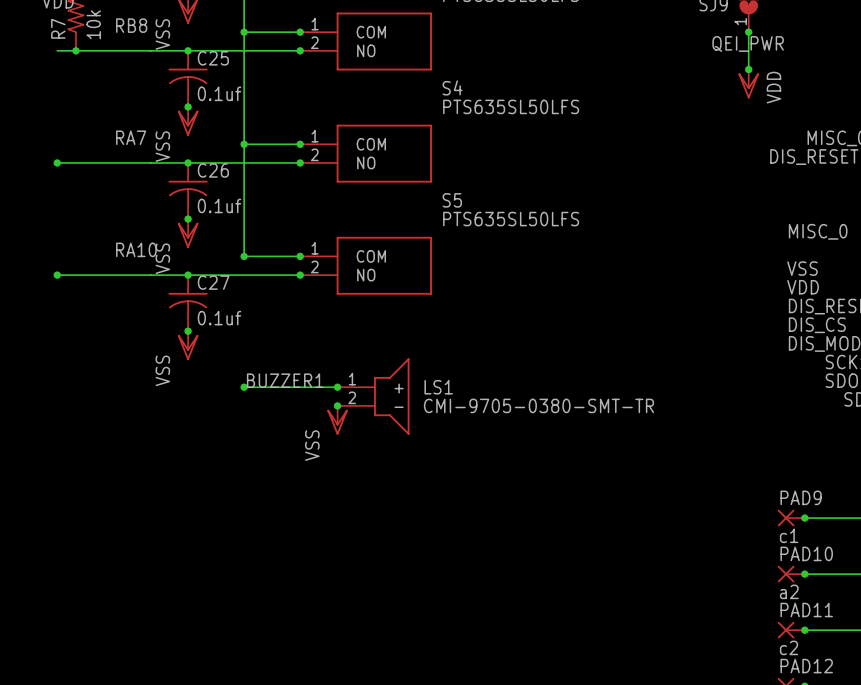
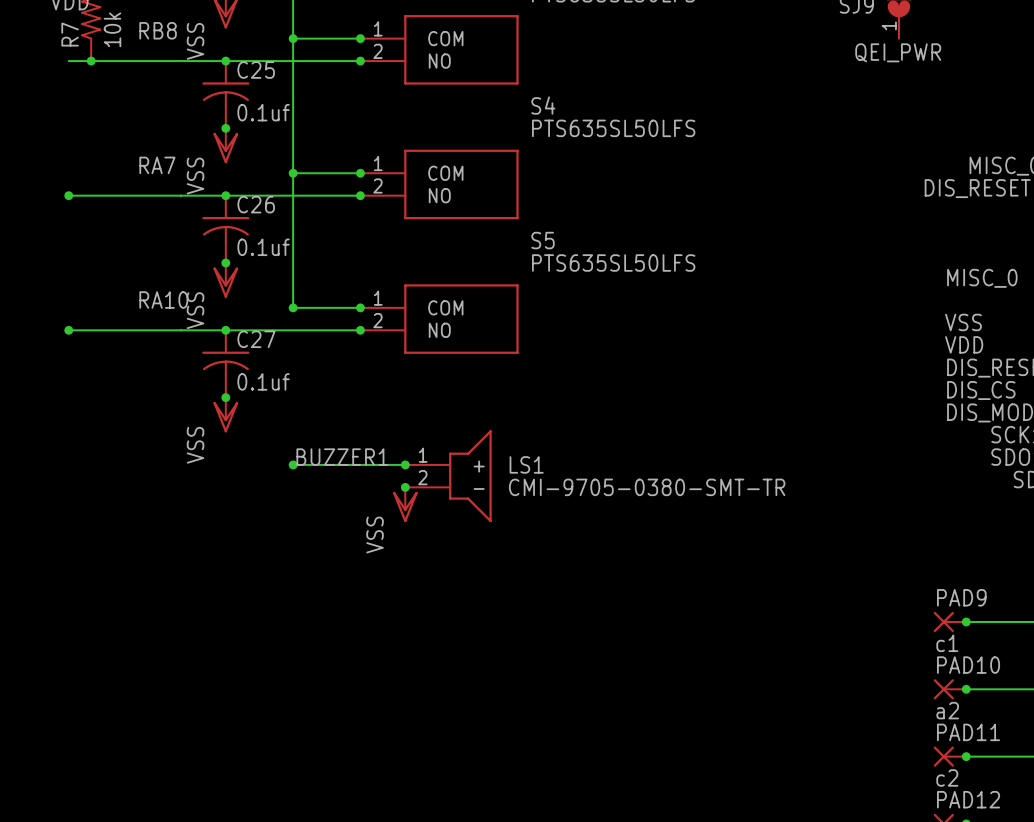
wire: (748, 32) (748, 69) -> none
junction: (748, 32) -> none
junction: (748, 69) -> none
power symbol: VDD (748, 84) -> none

